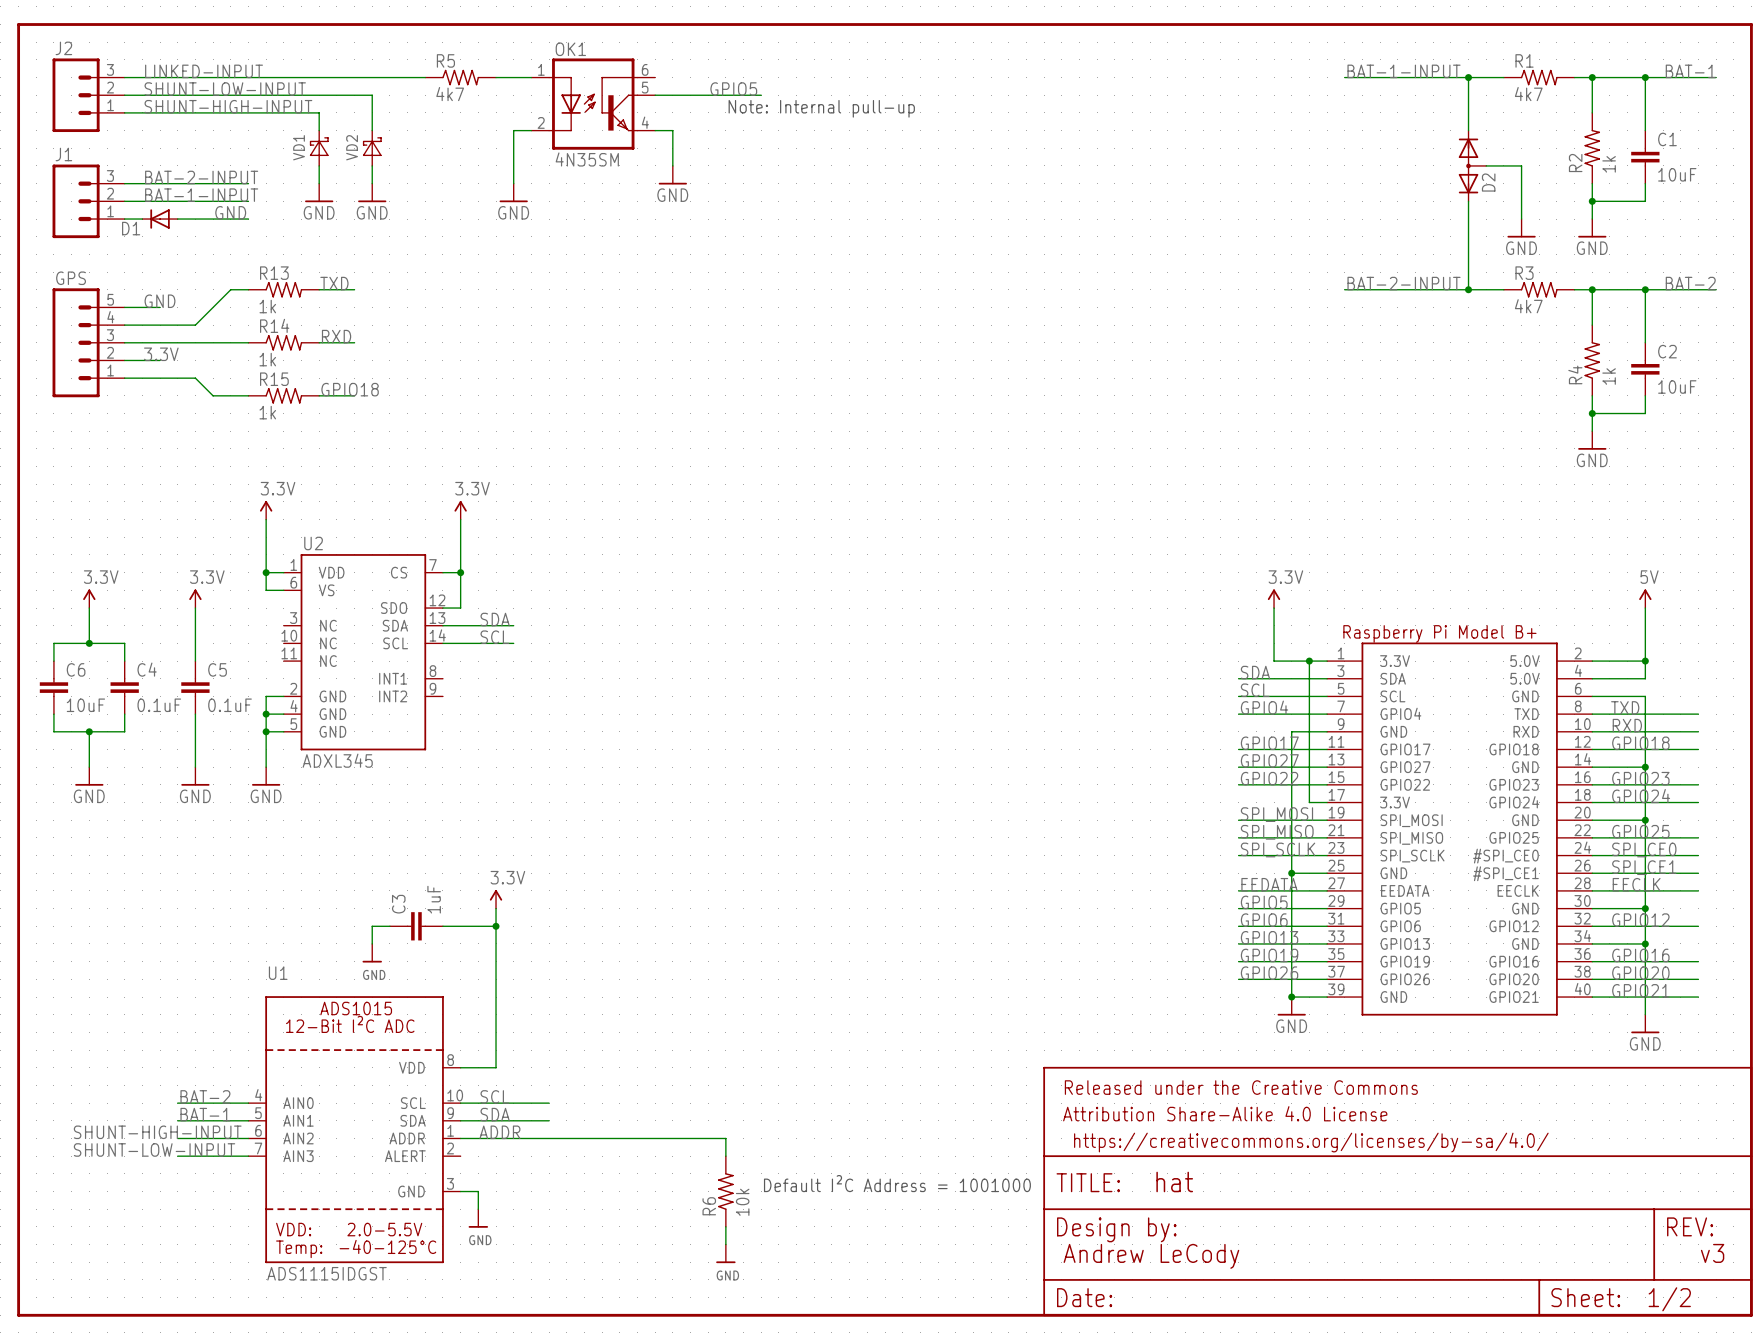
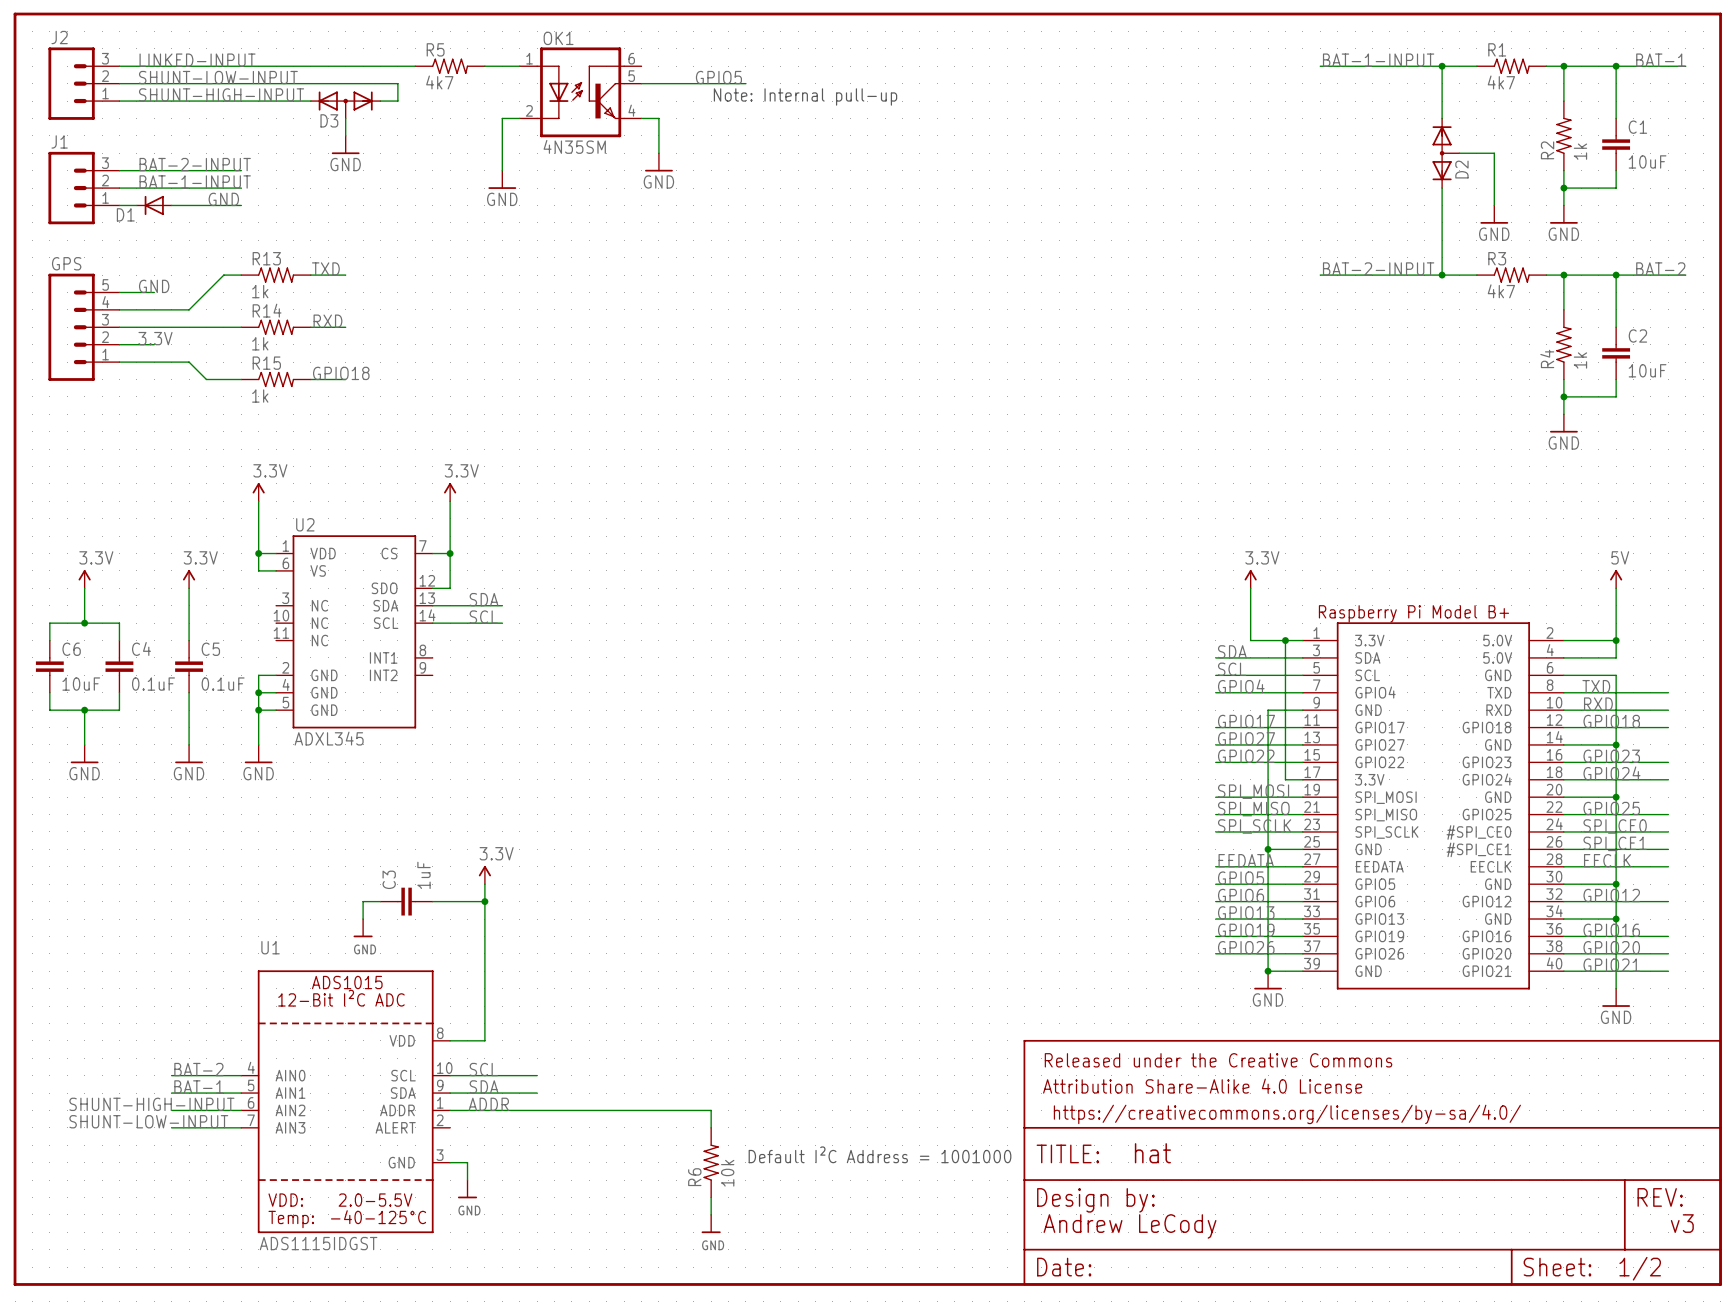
wire: (372, 95) (372, 130) -> (363, 83) (397, 83) (397, 101) (380, 101)
wire: (319, 112) (319, 130) -> none
D3: none -> (345, 104)
VD1: (319, 148) -> none
VD2: (372, 148) -> none
power symbol: none -> GND (345, 144)
wire: (319, 165) (319, 183) -> none
wire: (372, 165) (372, 183) -> (345, 118) (345, 135)
power symbol: GND (319, 192) -> none
power symbol: GND (372, 192) -> none

